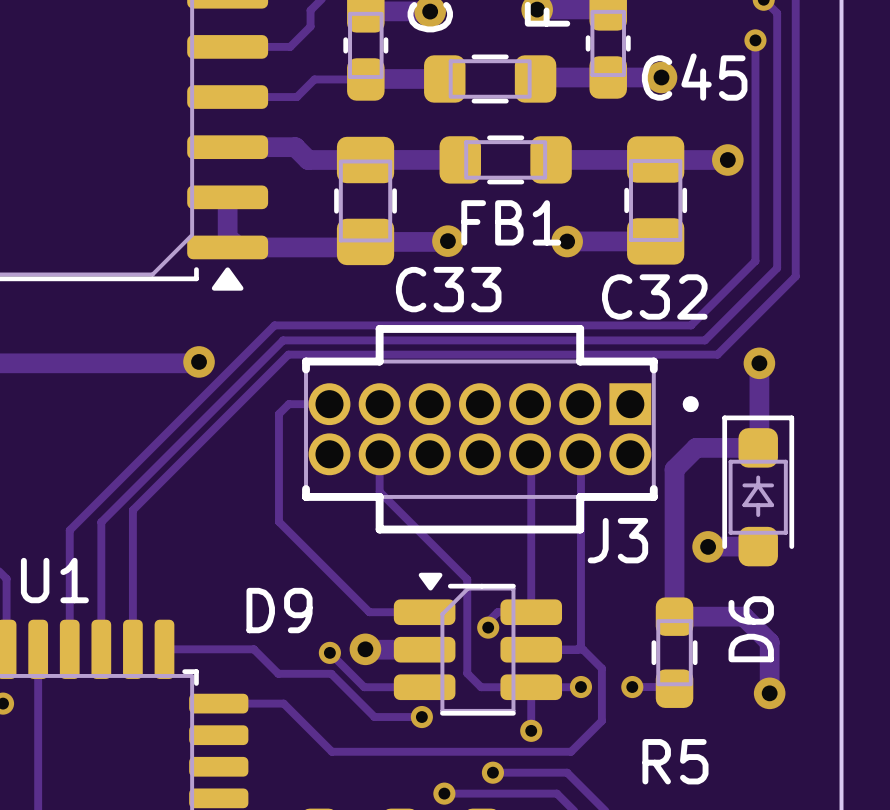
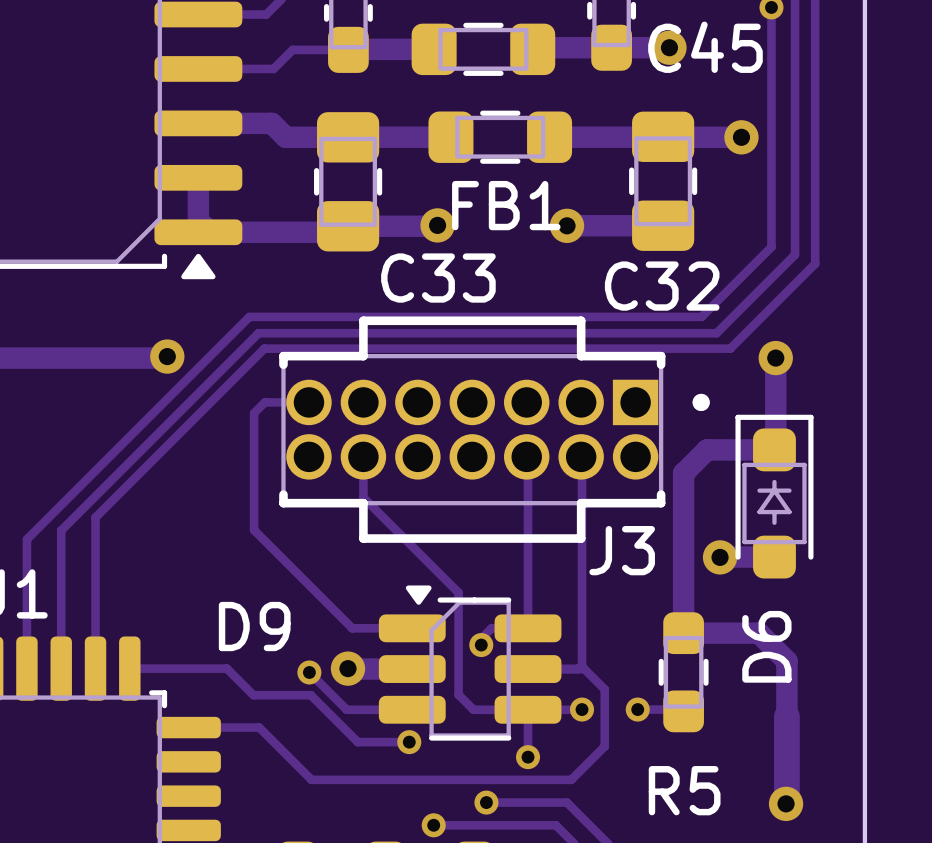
track: none -> (786, 716) (786, 803)
via position: (769, 693) -> (786, 803)

